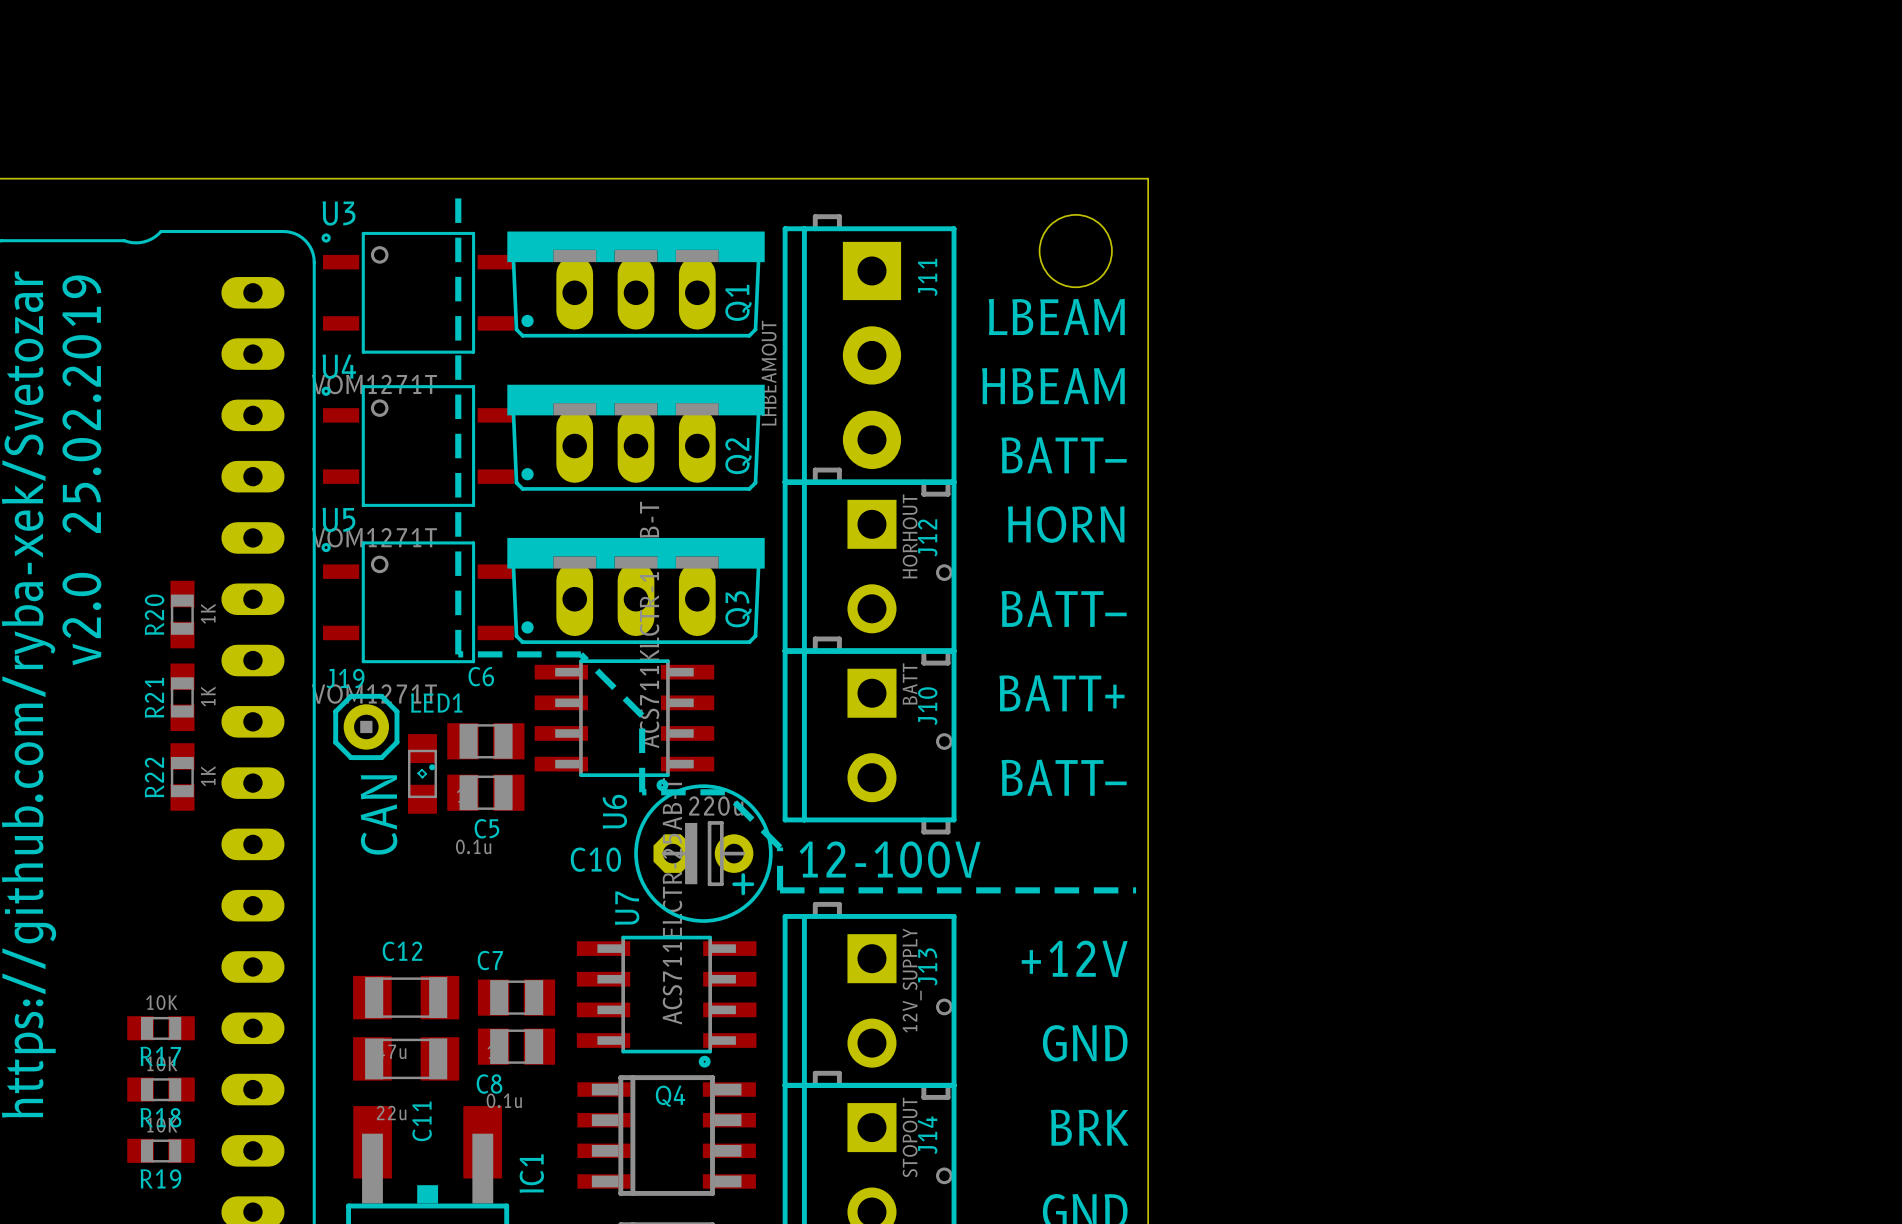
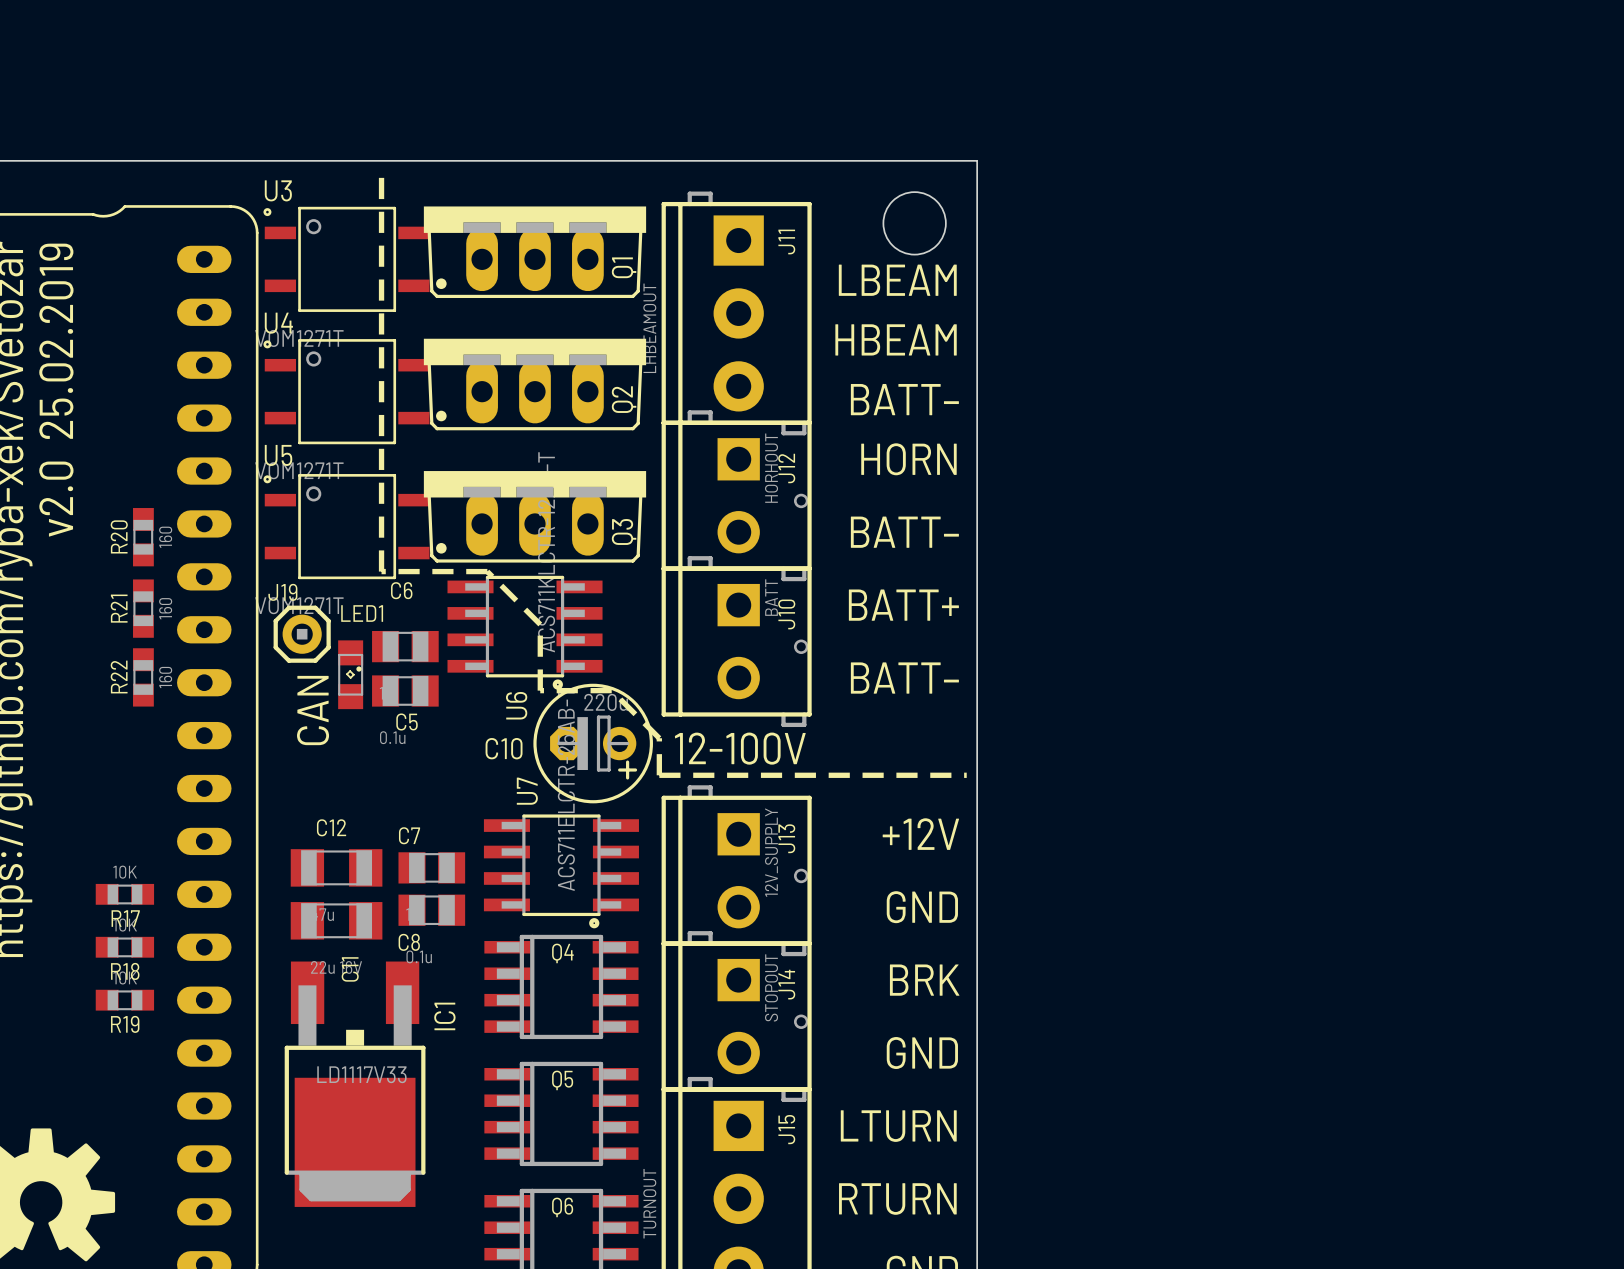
R20 value: 1K (208, 613) -> 160 (165, 537)
R21 value: 1K (208, 696) -> 160 (165, 608)
R22 value: 1K (208, 776) -> 160 (165, 677)
C11 value: 22u (391, 1113) -> 22u 16V (336, 967)

